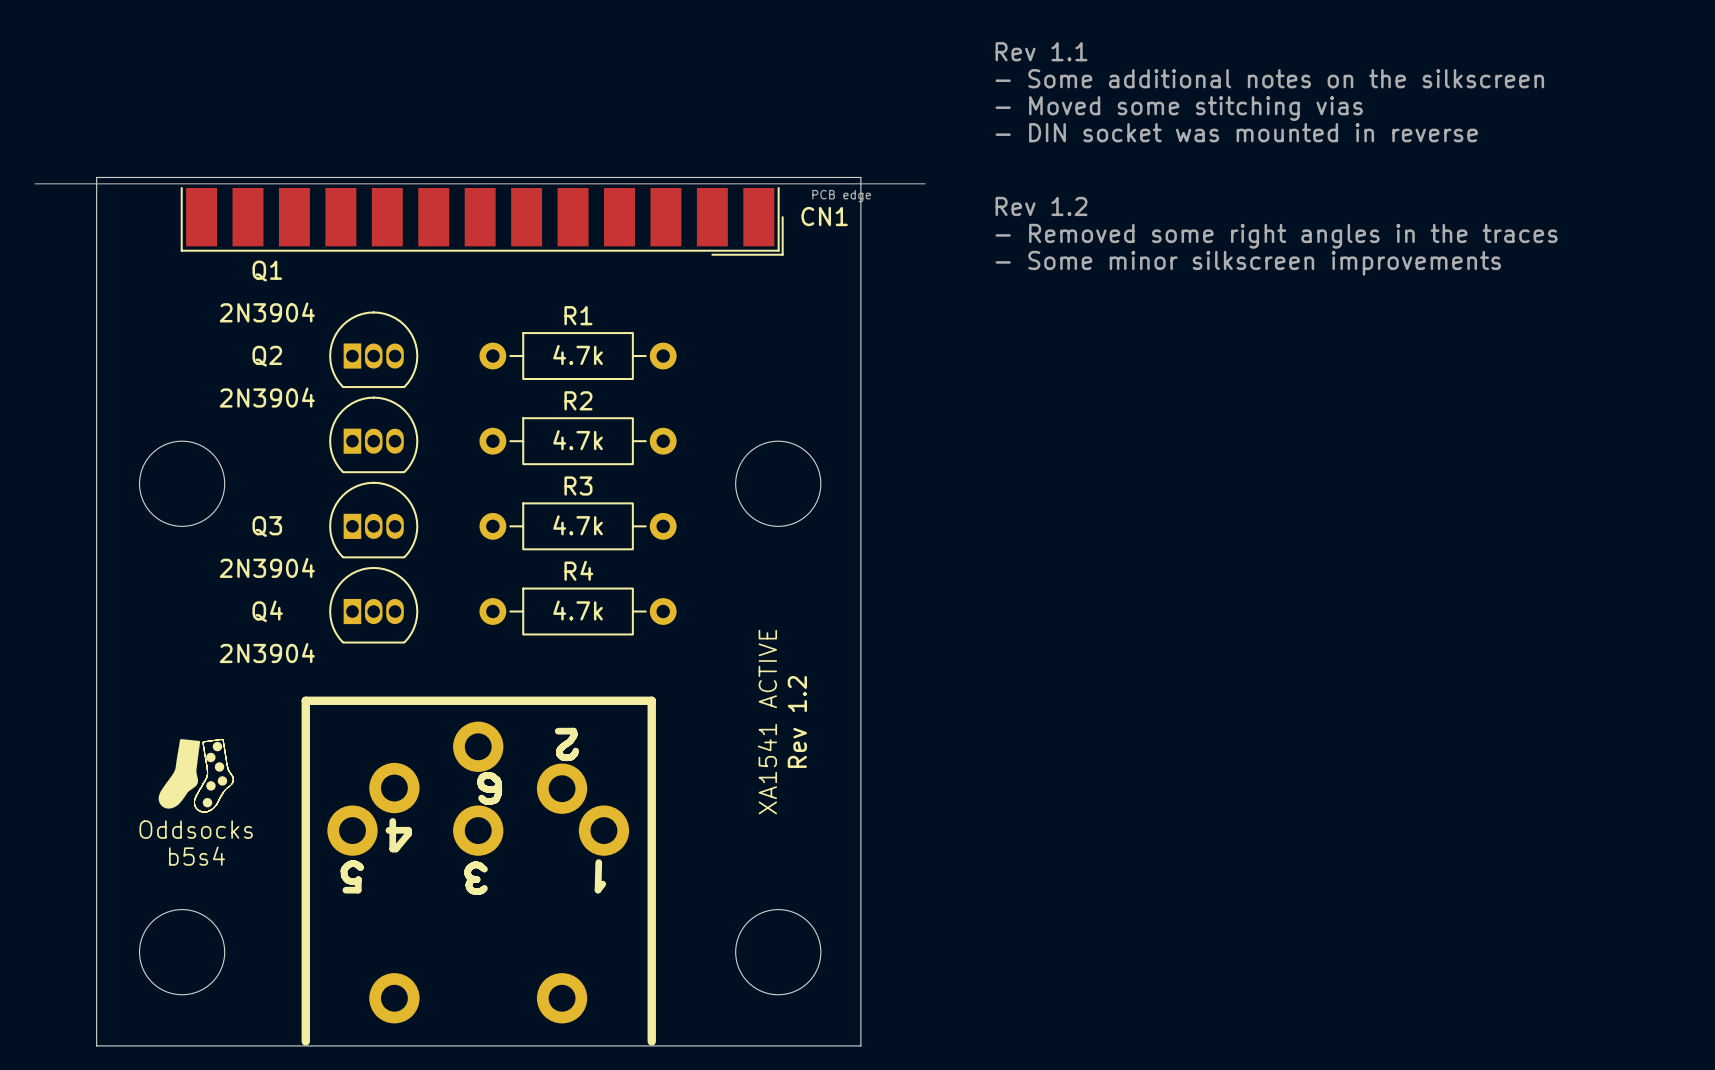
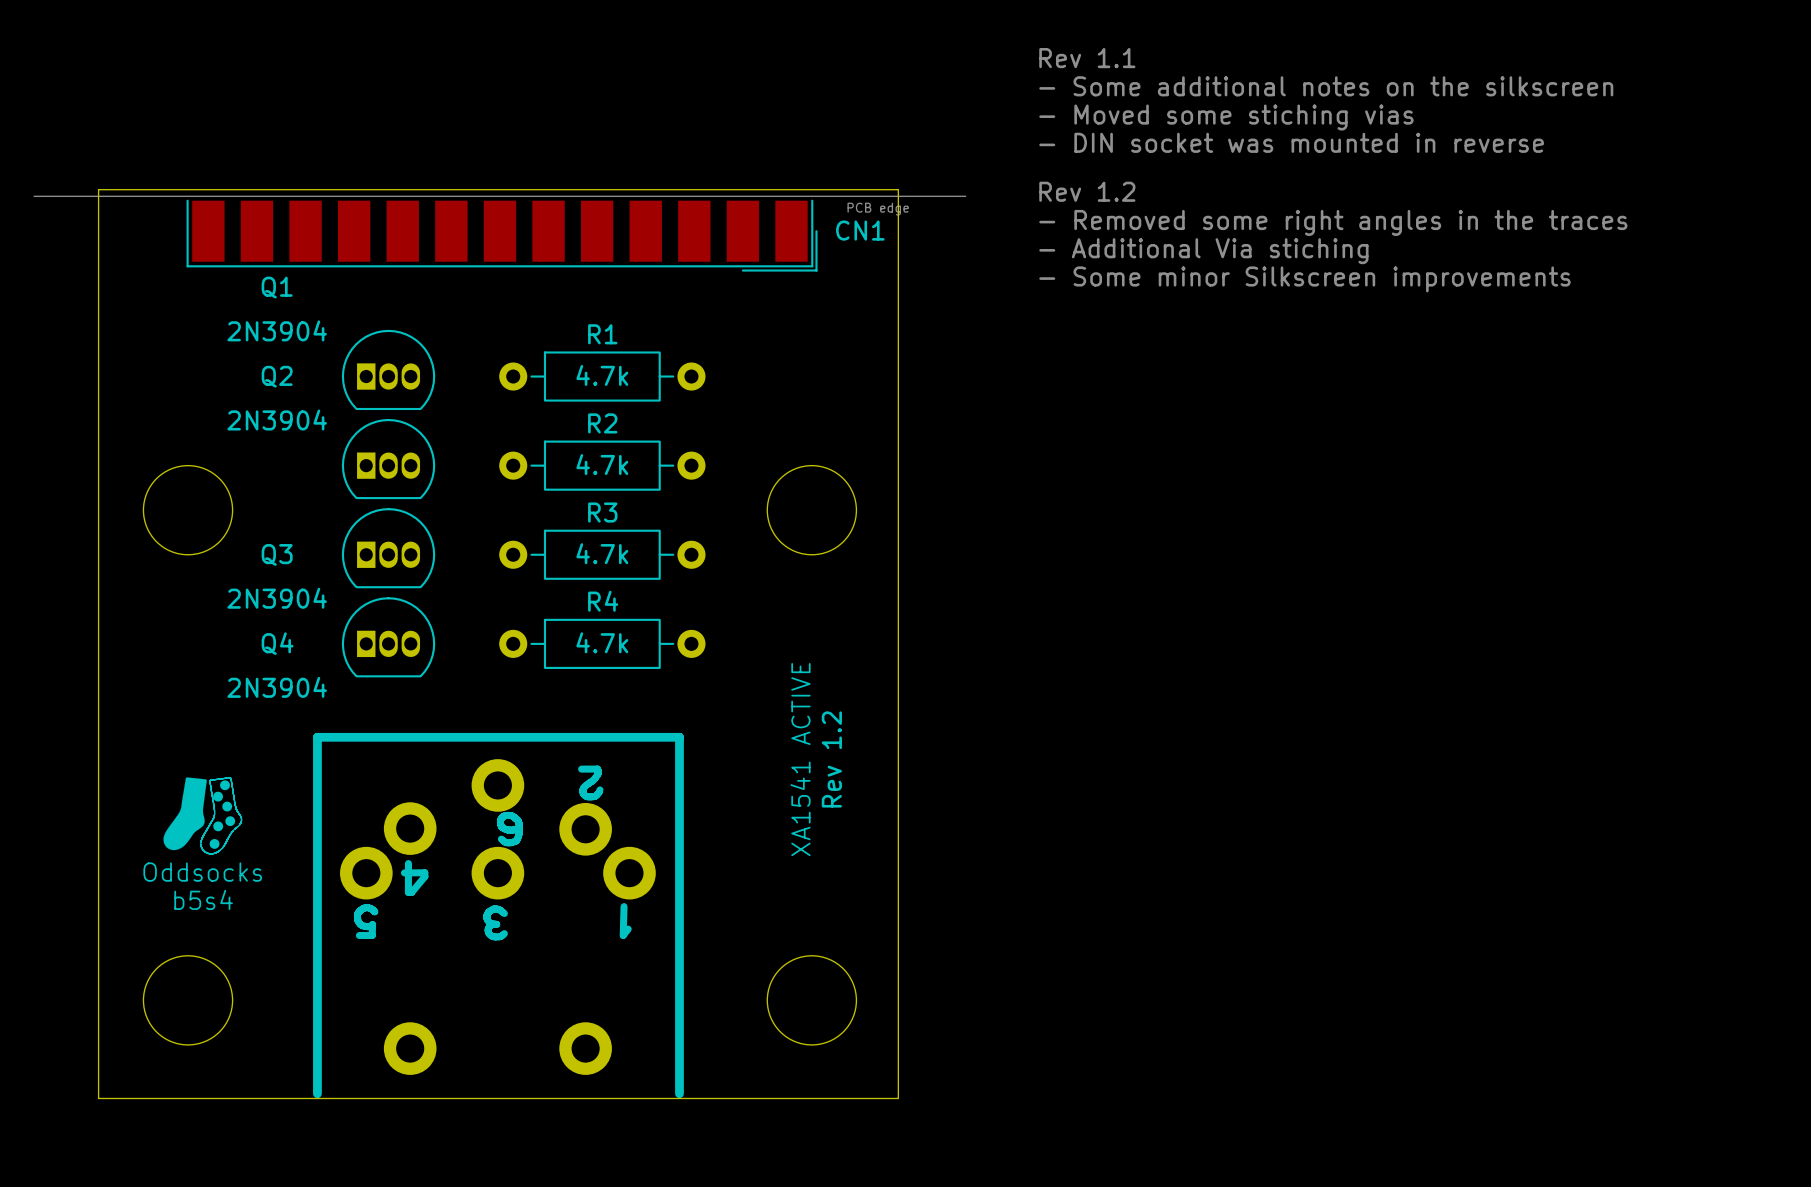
text: - Moved some stitching vias (1179, 108) -> - Moved some stiching vias (1226, 117)
text: none -> Rev 1.2 (1087, 191)
text: Rev 1.2 (1041, 206) -> - Removed some right angles in the traces (1333, 222)
text: - Removed some right angles in the traces (1276, 236) -> - Additional Via stiching (1203, 251)
text: - Some minor silkscreen improvements (1248, 263) -> - Some minor Silkscreen improvements (1304, 279)

